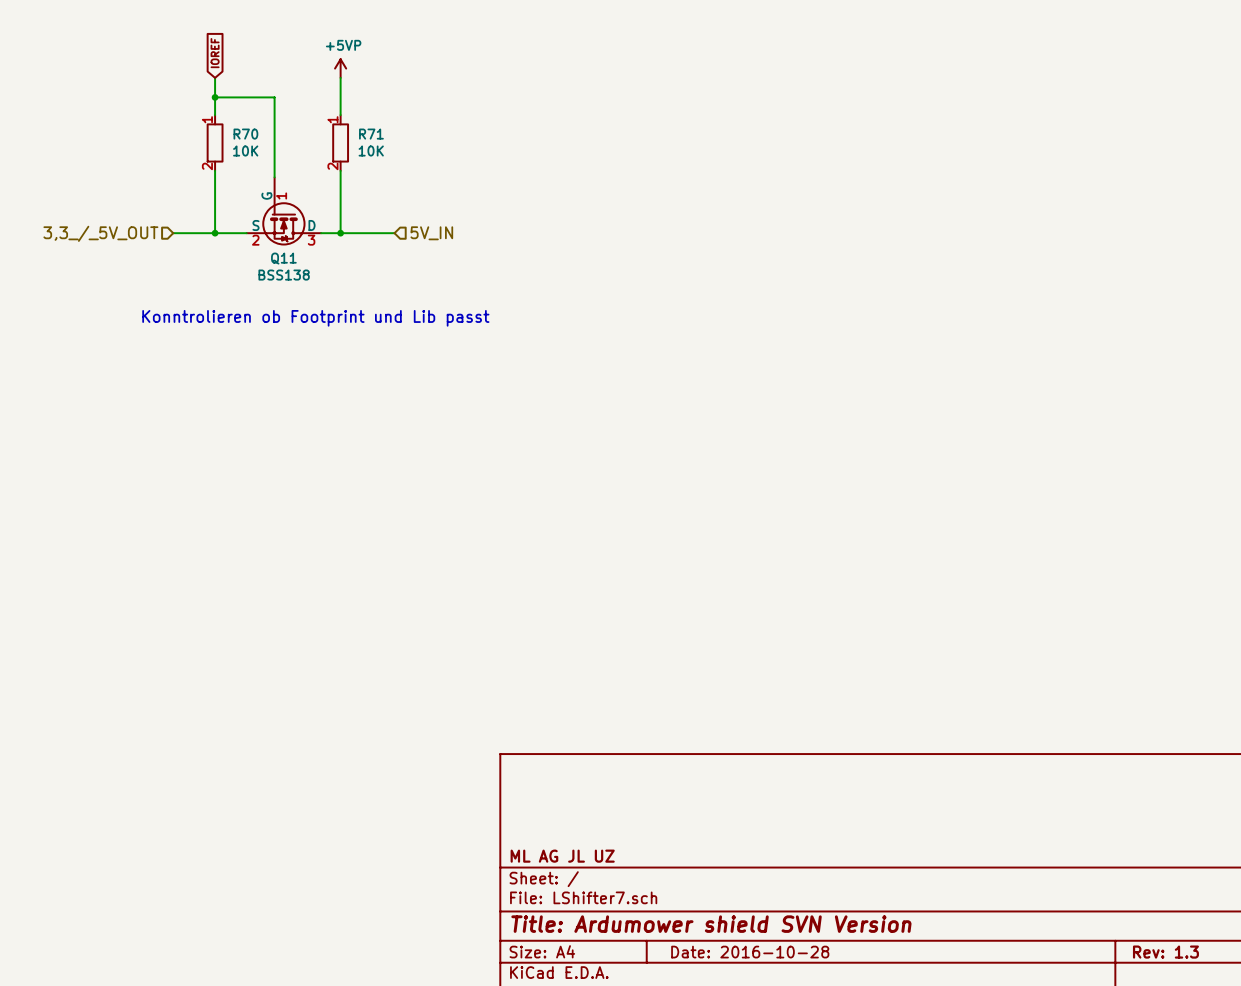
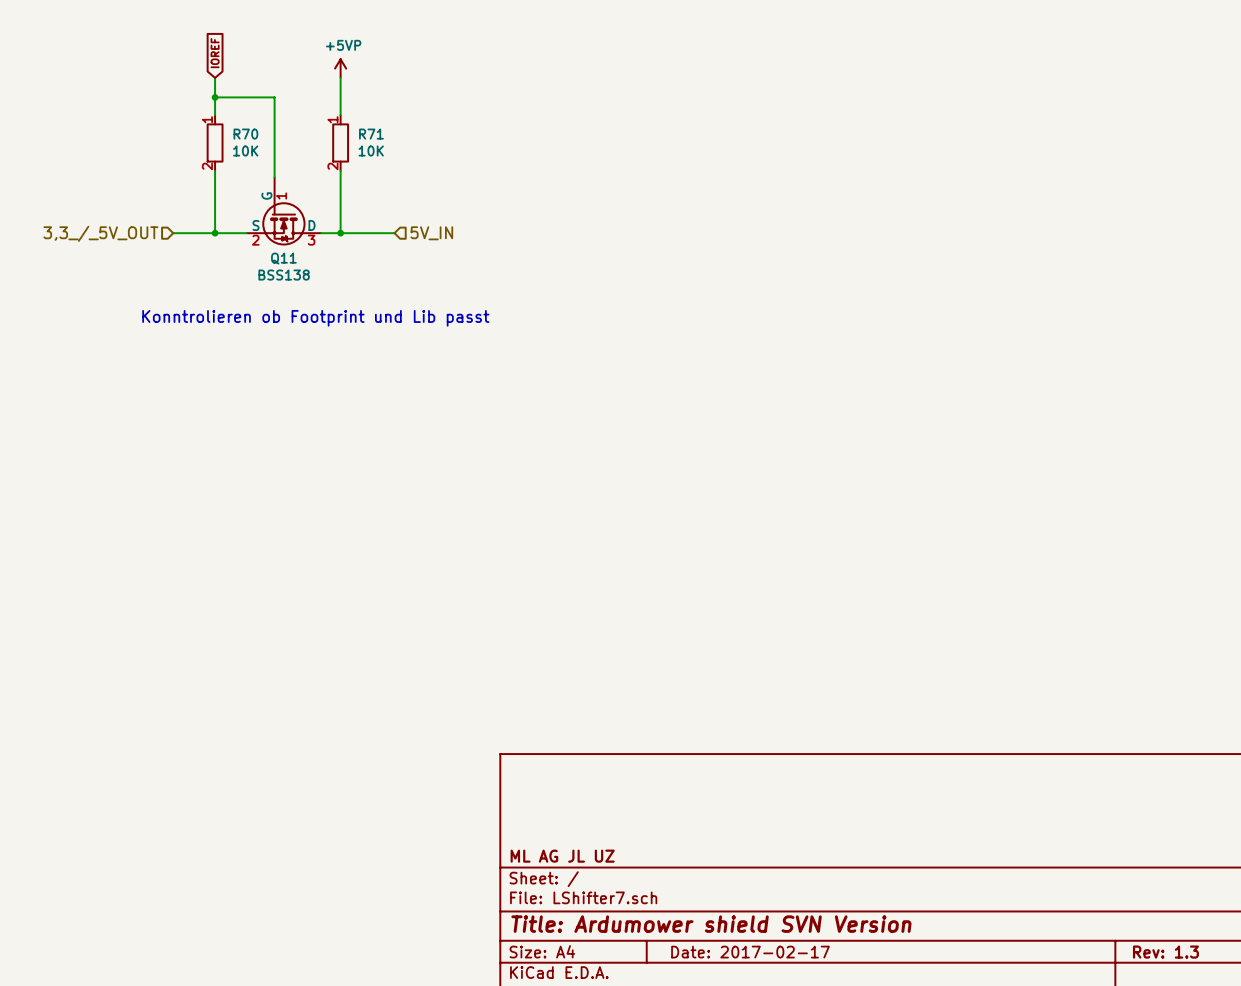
title block: Date: 2016-10-28 (750, 952) -> Date: 2017-02-17 (750, 952)

